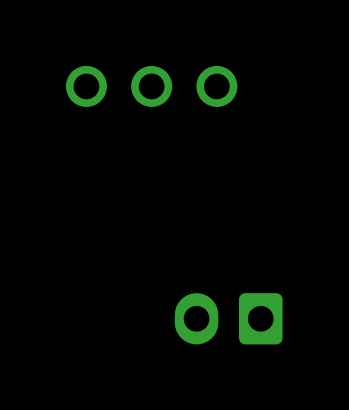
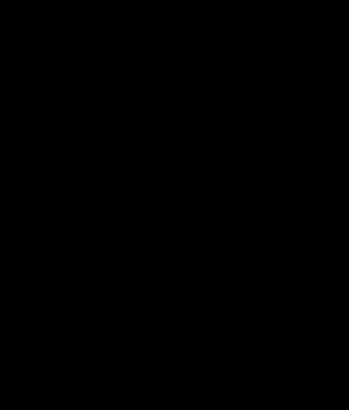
part: (151, 86) -> none
part: (228, 318) -> none

